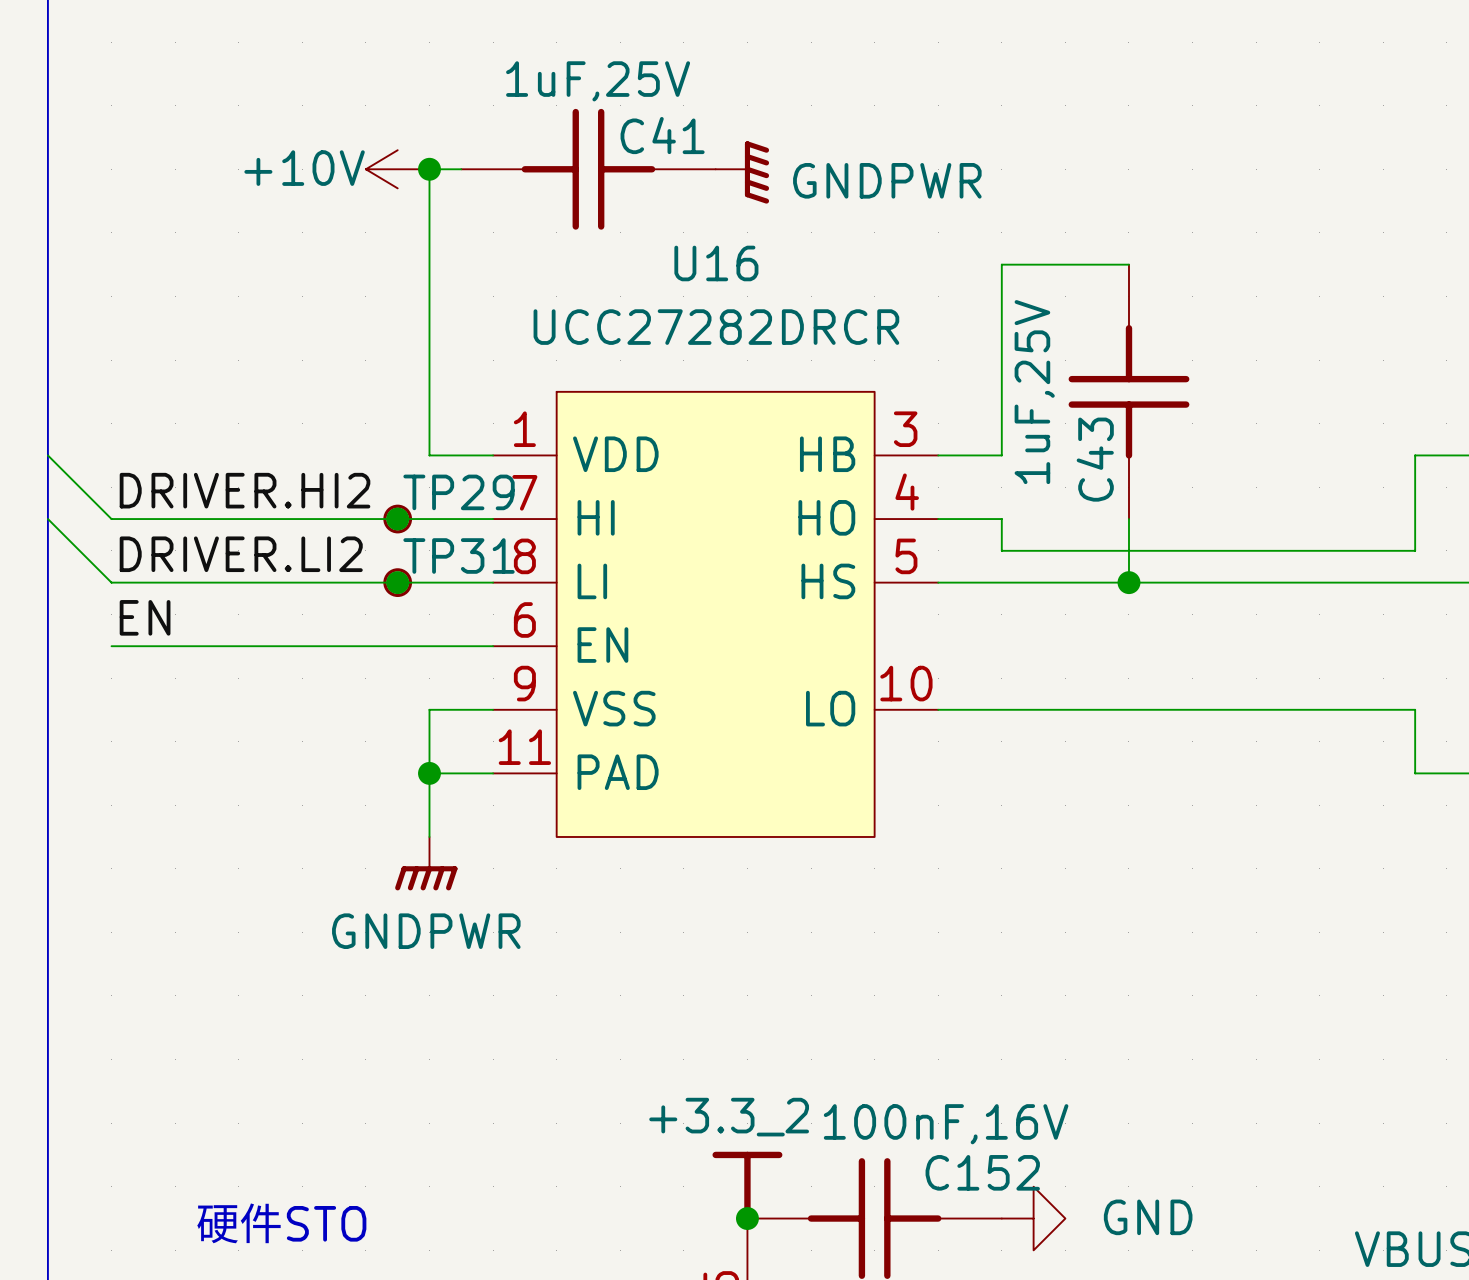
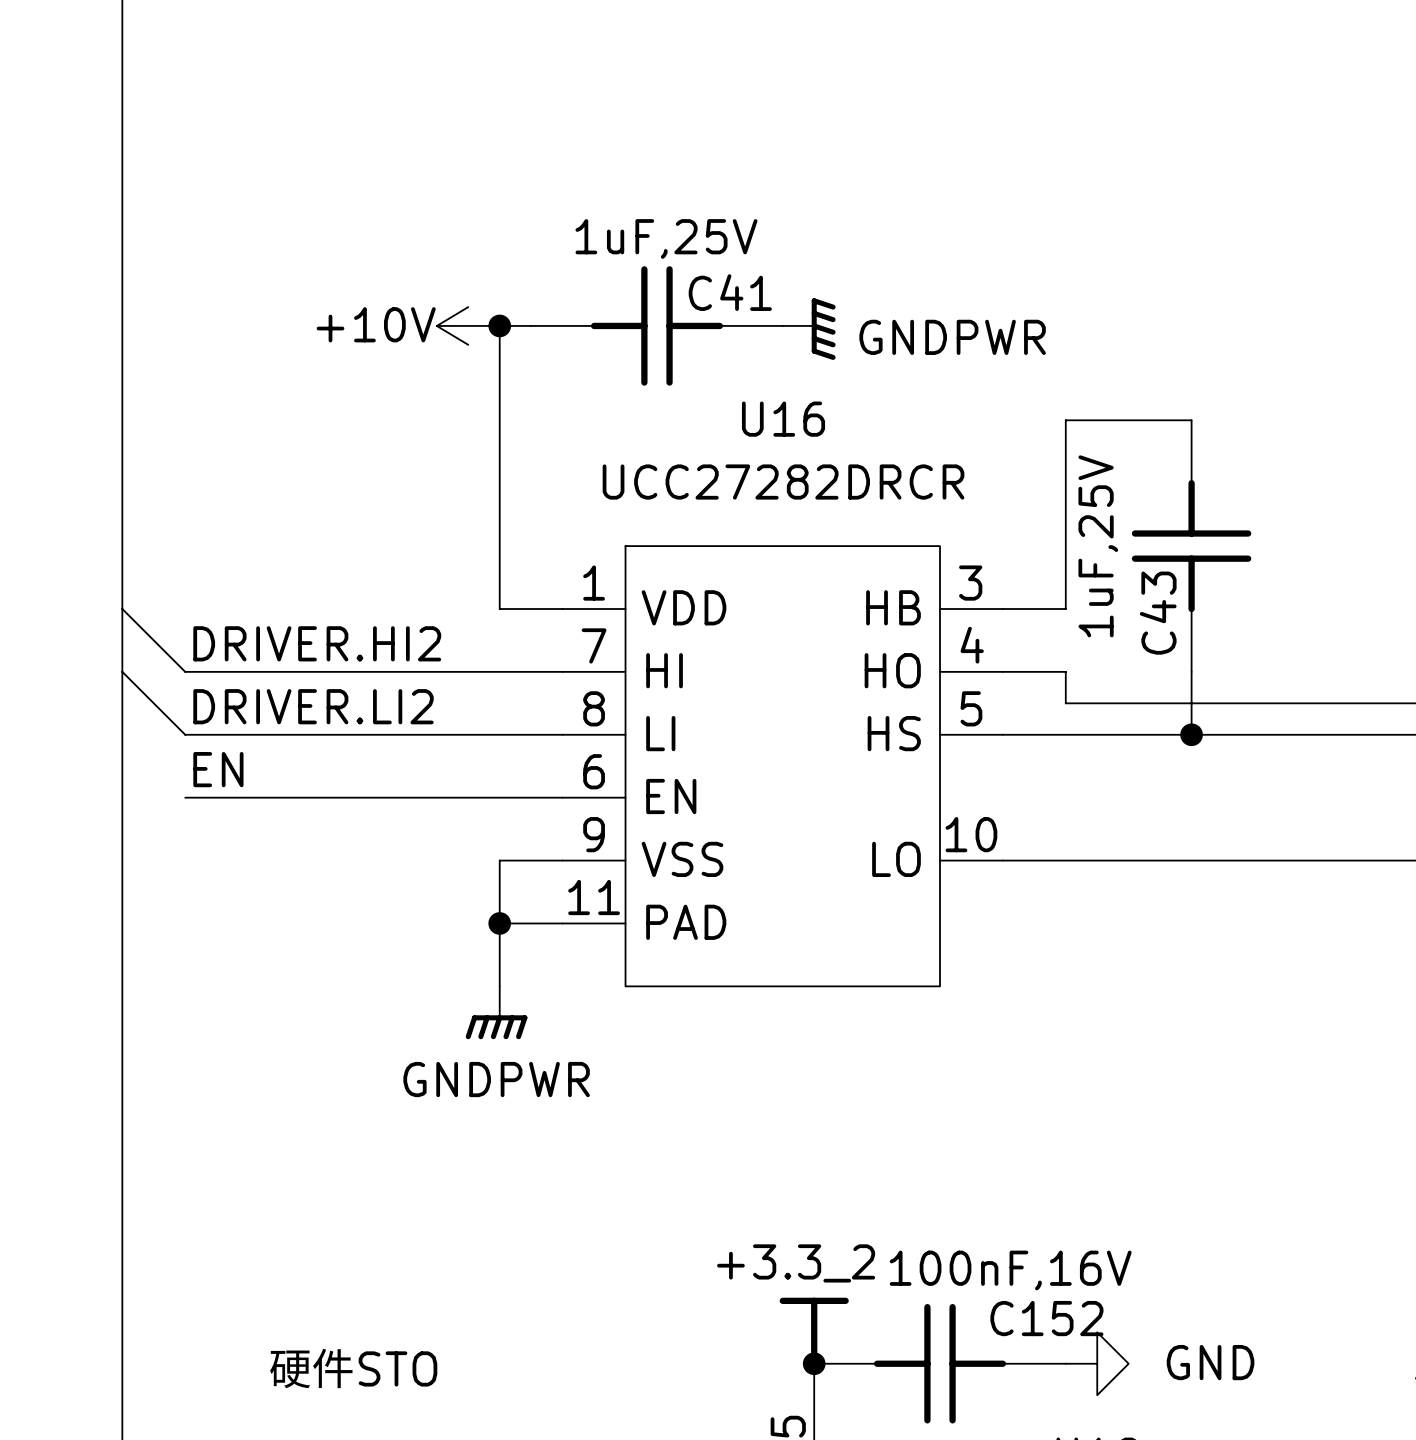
junction: (397, 519) -> none
TP29: (397, 519) -> none
junction: (397, 582) -> none
TP31: (397, 582) -> none

